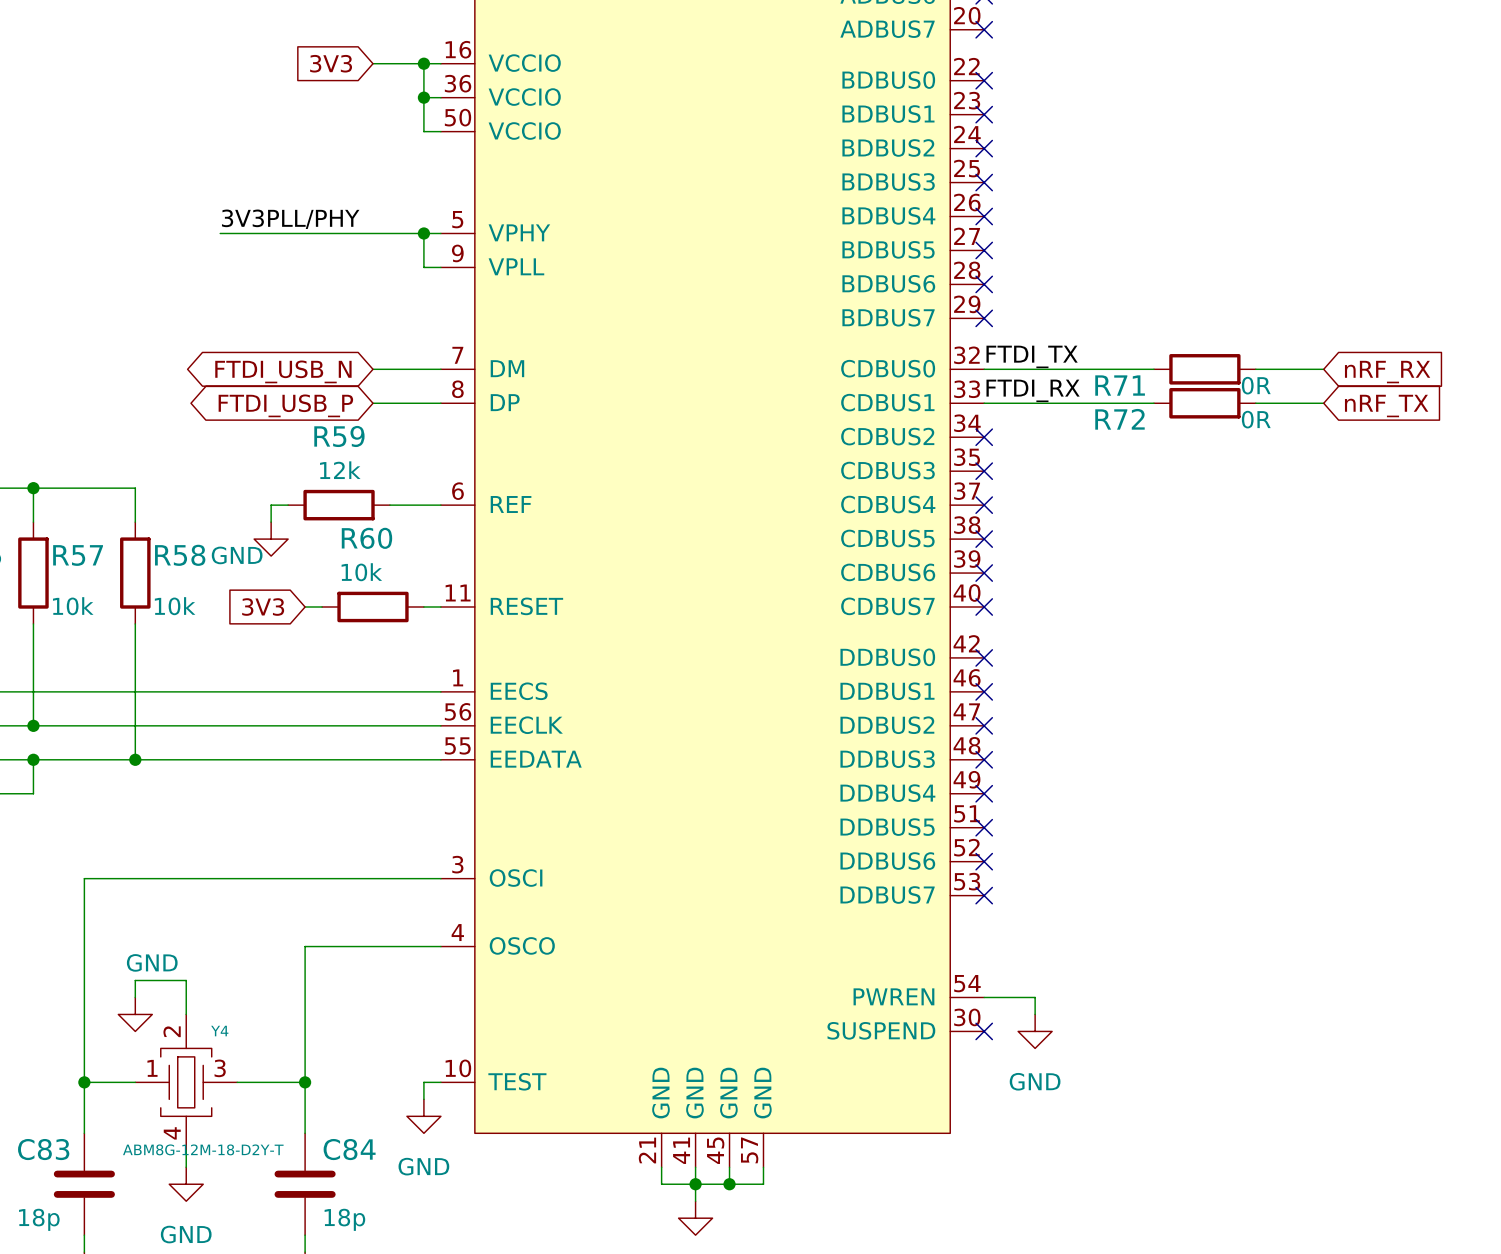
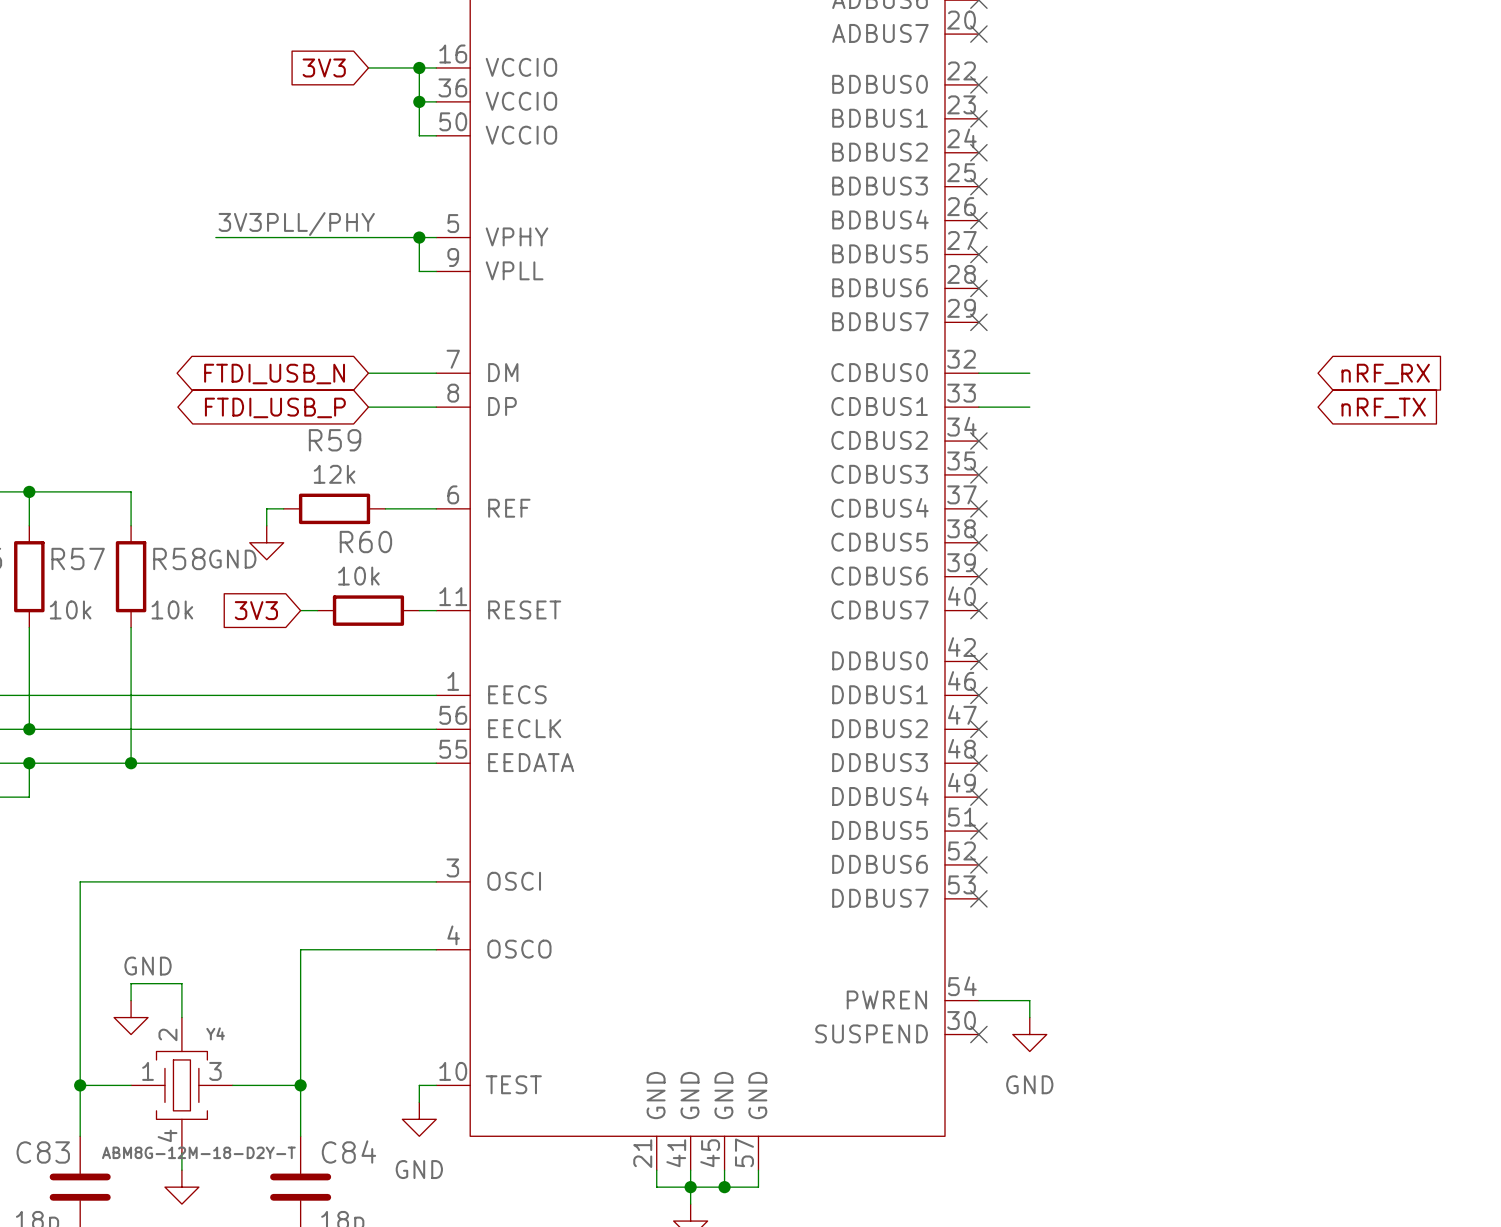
label: FTDI_TX (1032, 356) -> none
wire: (1035, 369) (1153, 369) -> none
R71: (1204, 369) -> none
wire: (1255, 369) (1323, 369) -> none
label: FTDI_RX (1033, 390) -> none
wire: (1035, 403) (1153, 403) -> none
R72: (1204, 403) -> none
wire: (1255, 403) (1323, 403) -> none

